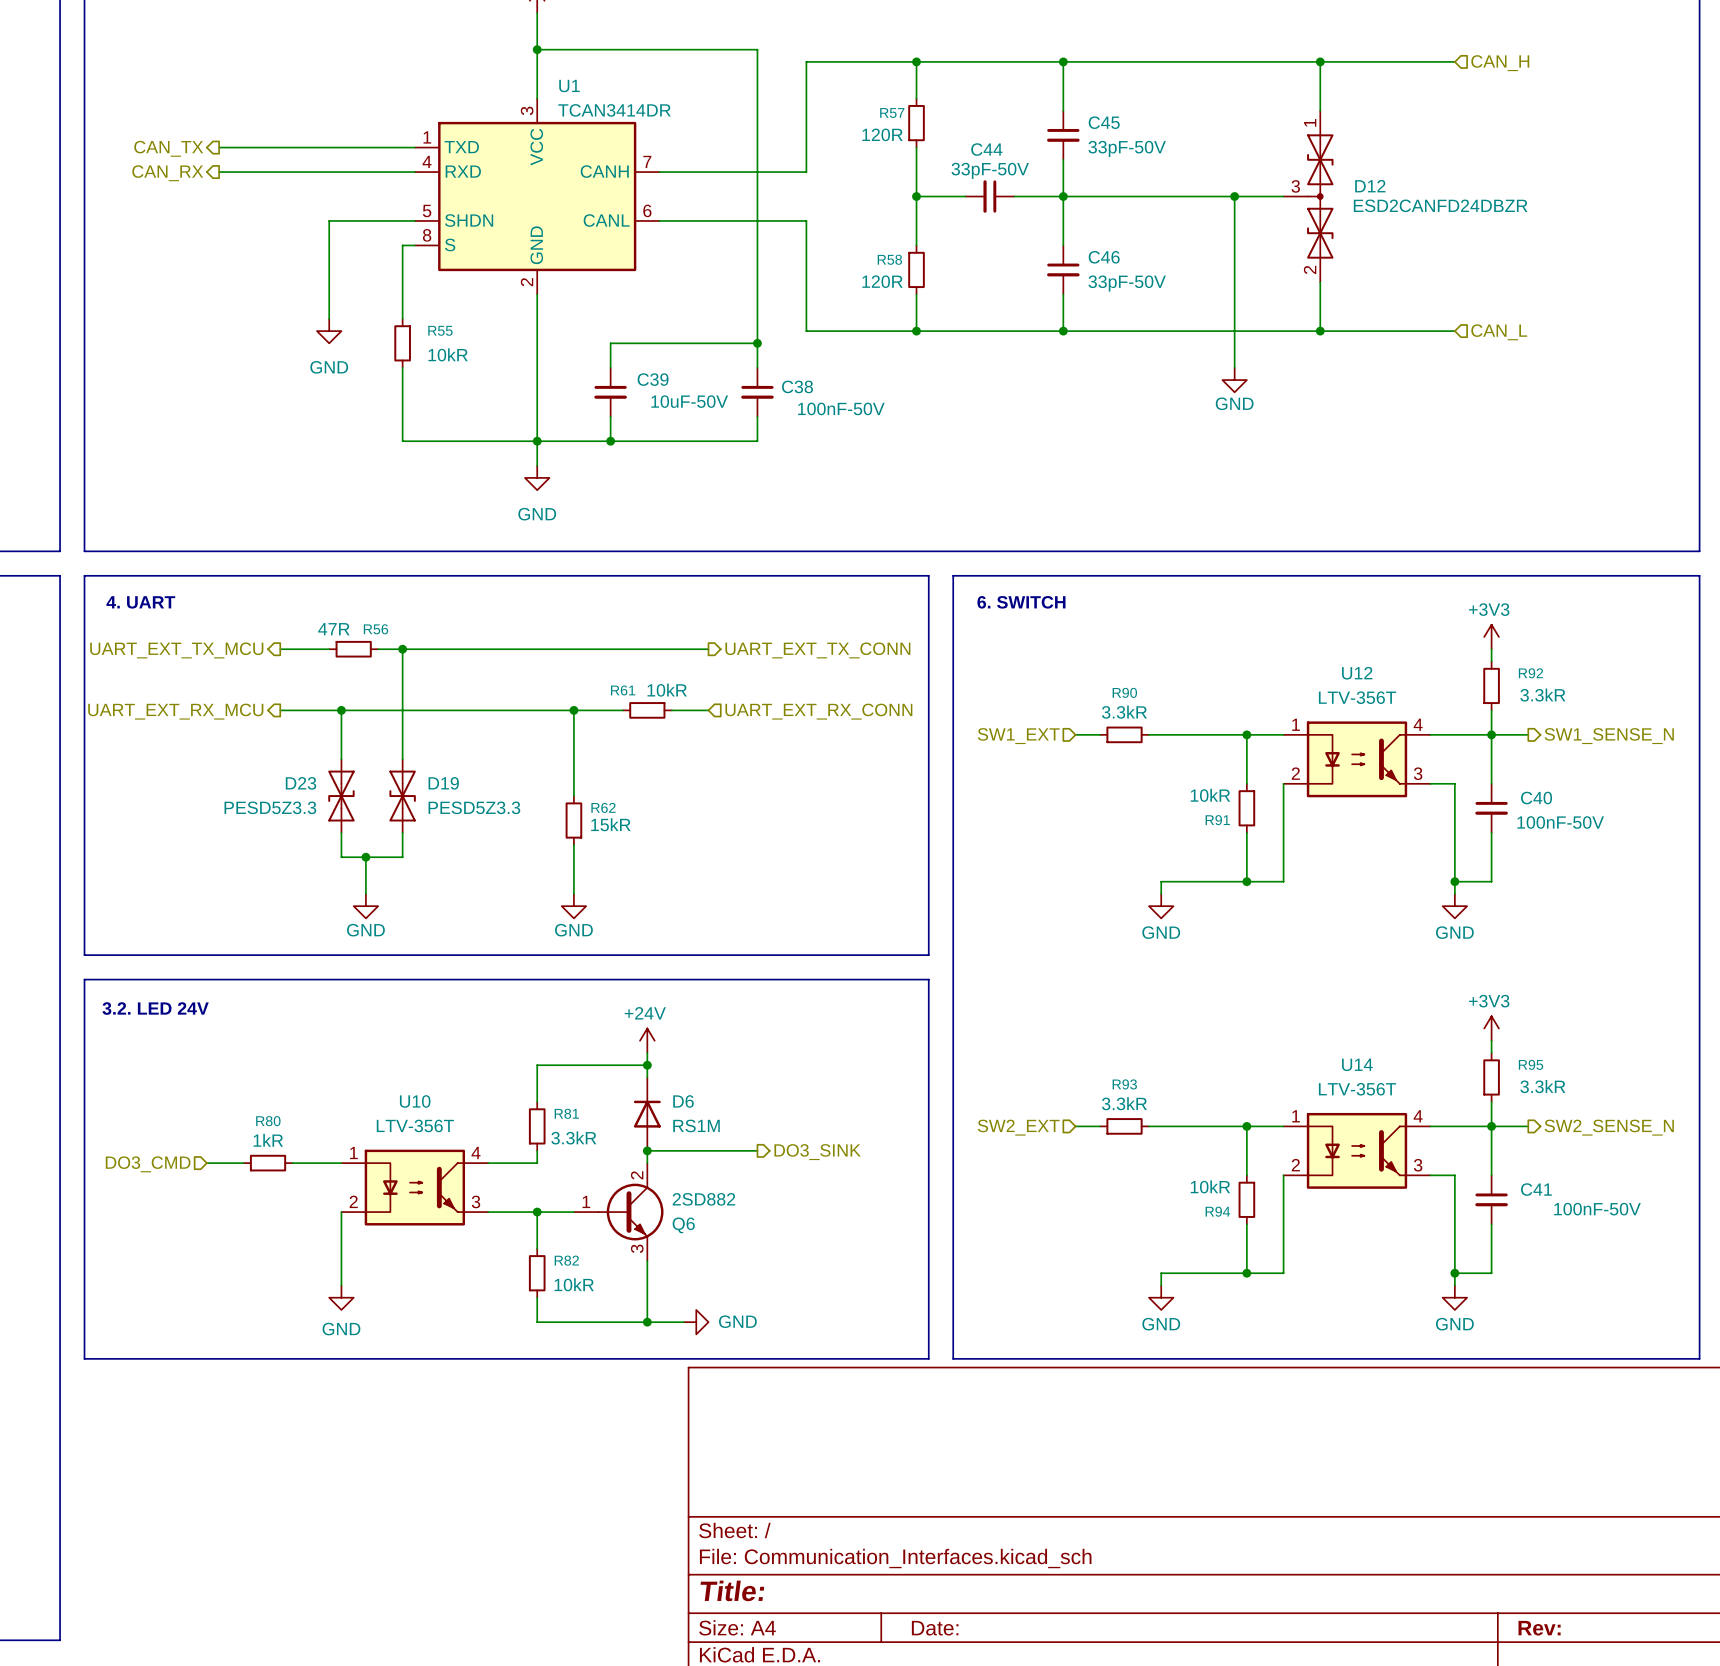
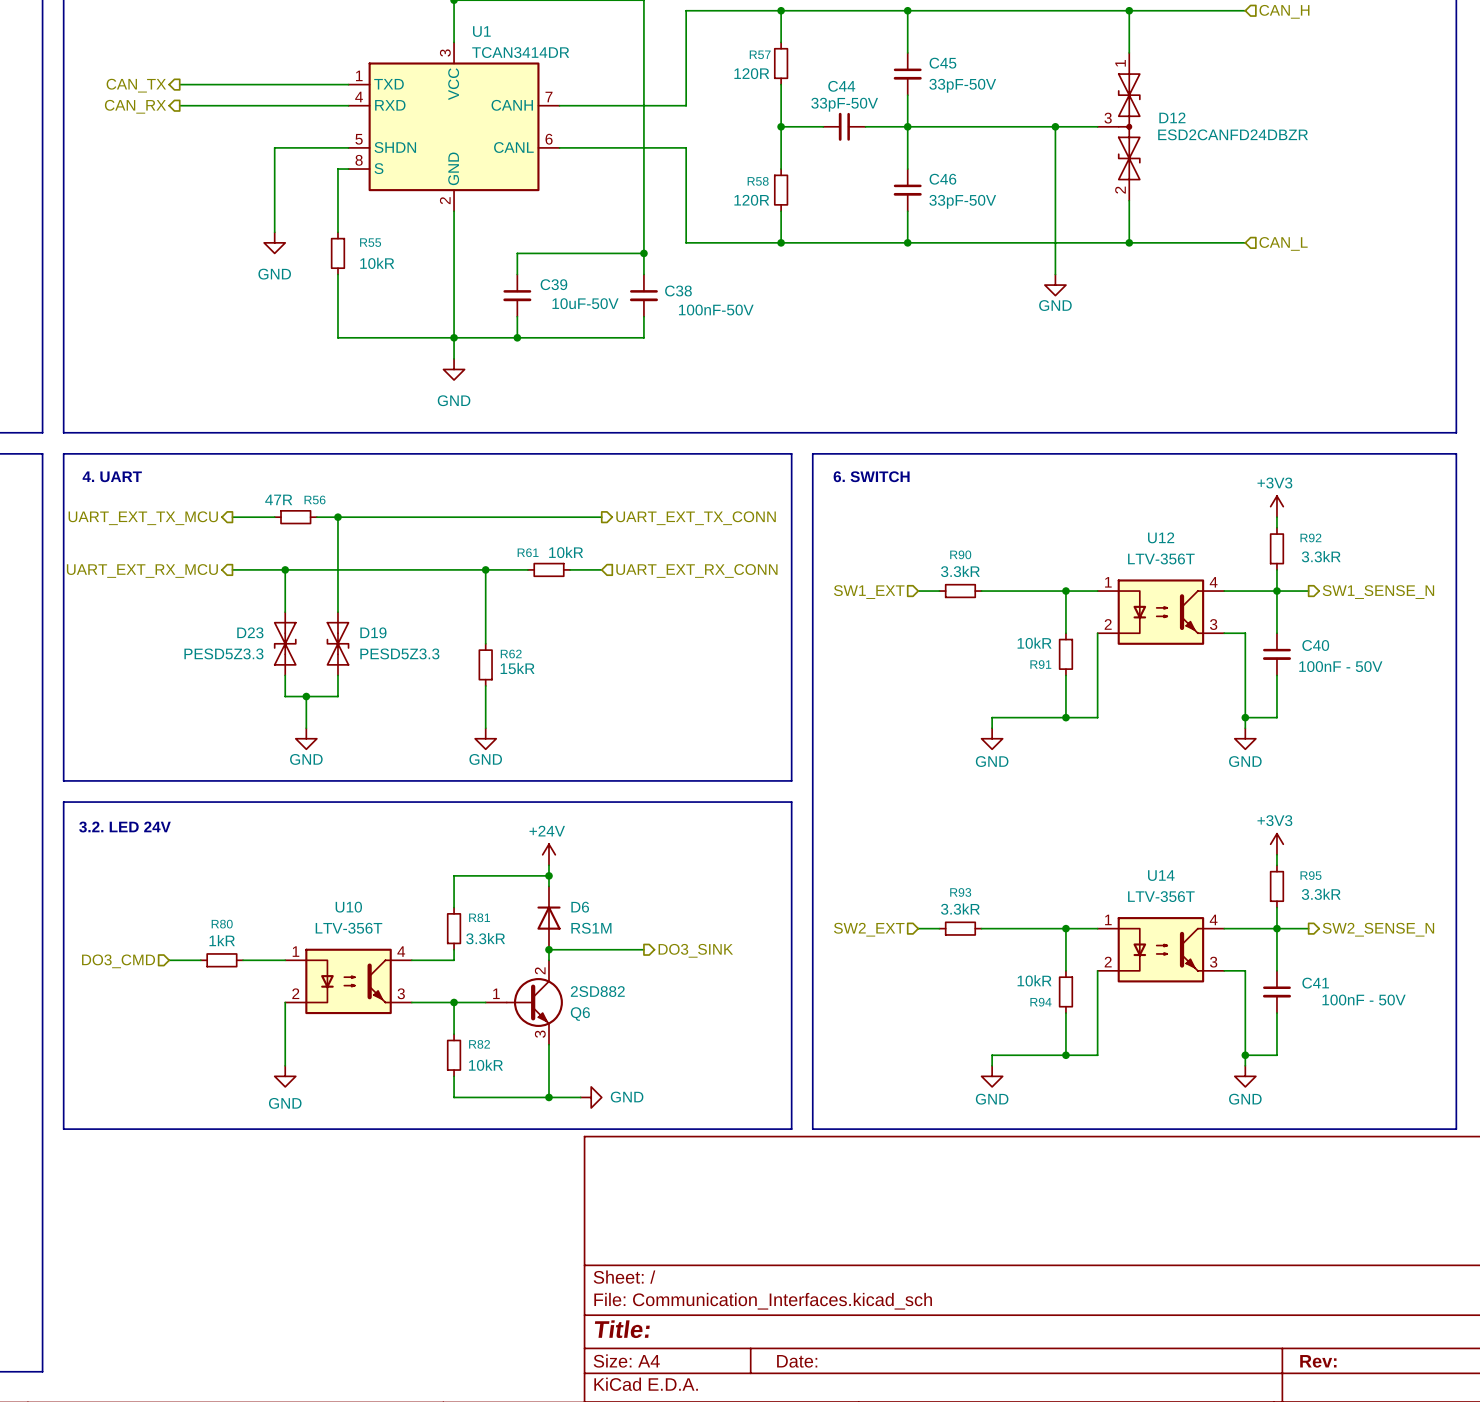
C40 value: 100nF-50V (1560, 822) -> 100nF - 50V (1340, 666)
C41 value: 100nF-50V (1597, 1209) -> 100nF - 50V (1364, 999)

